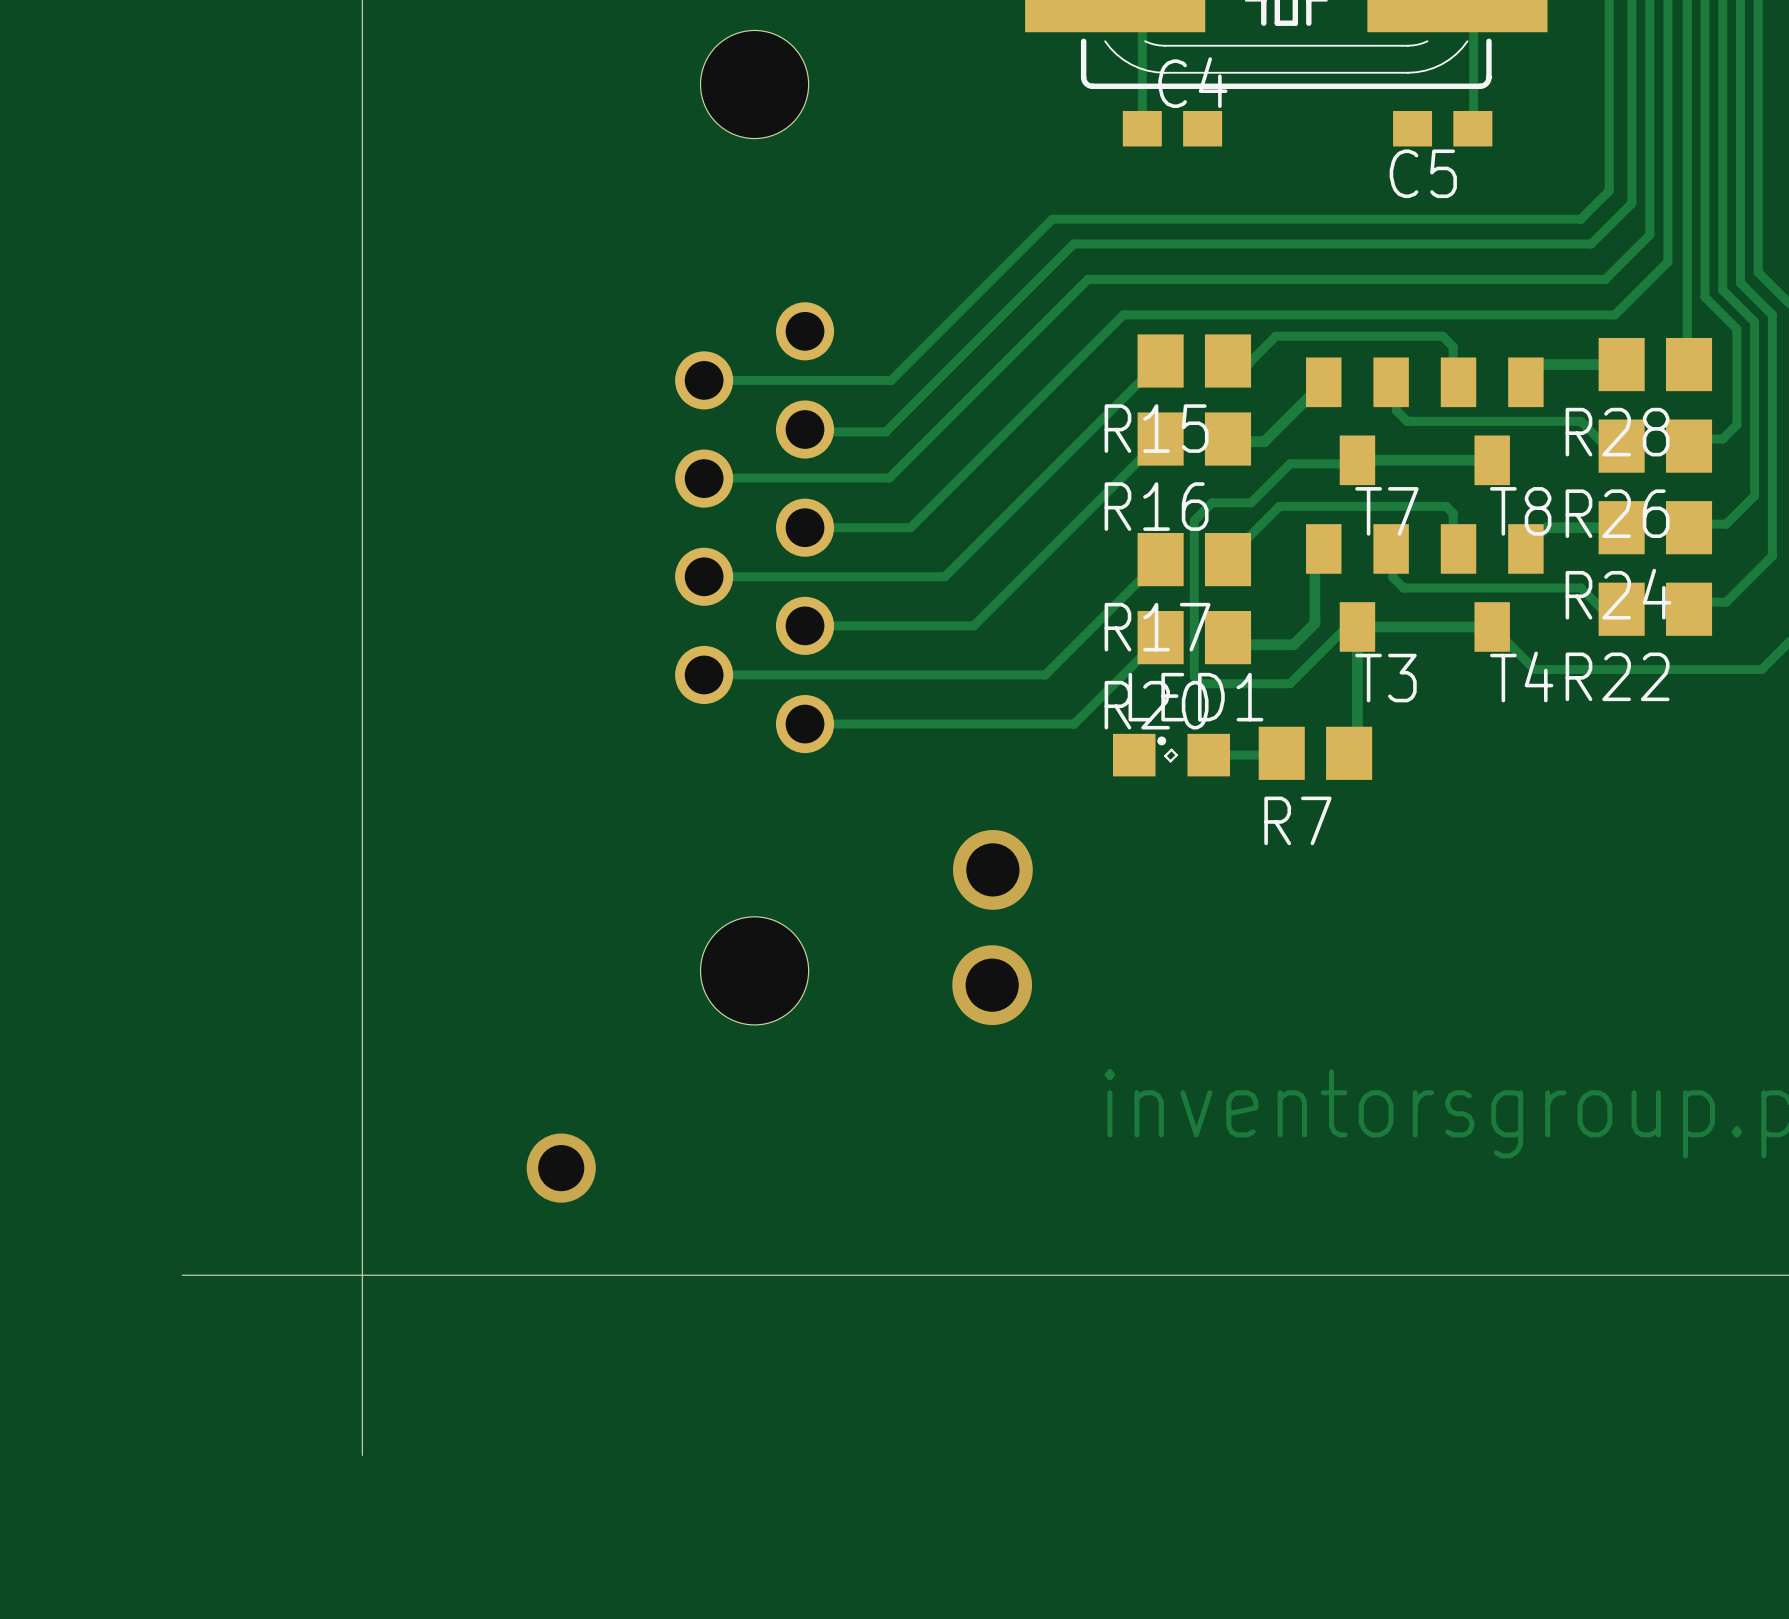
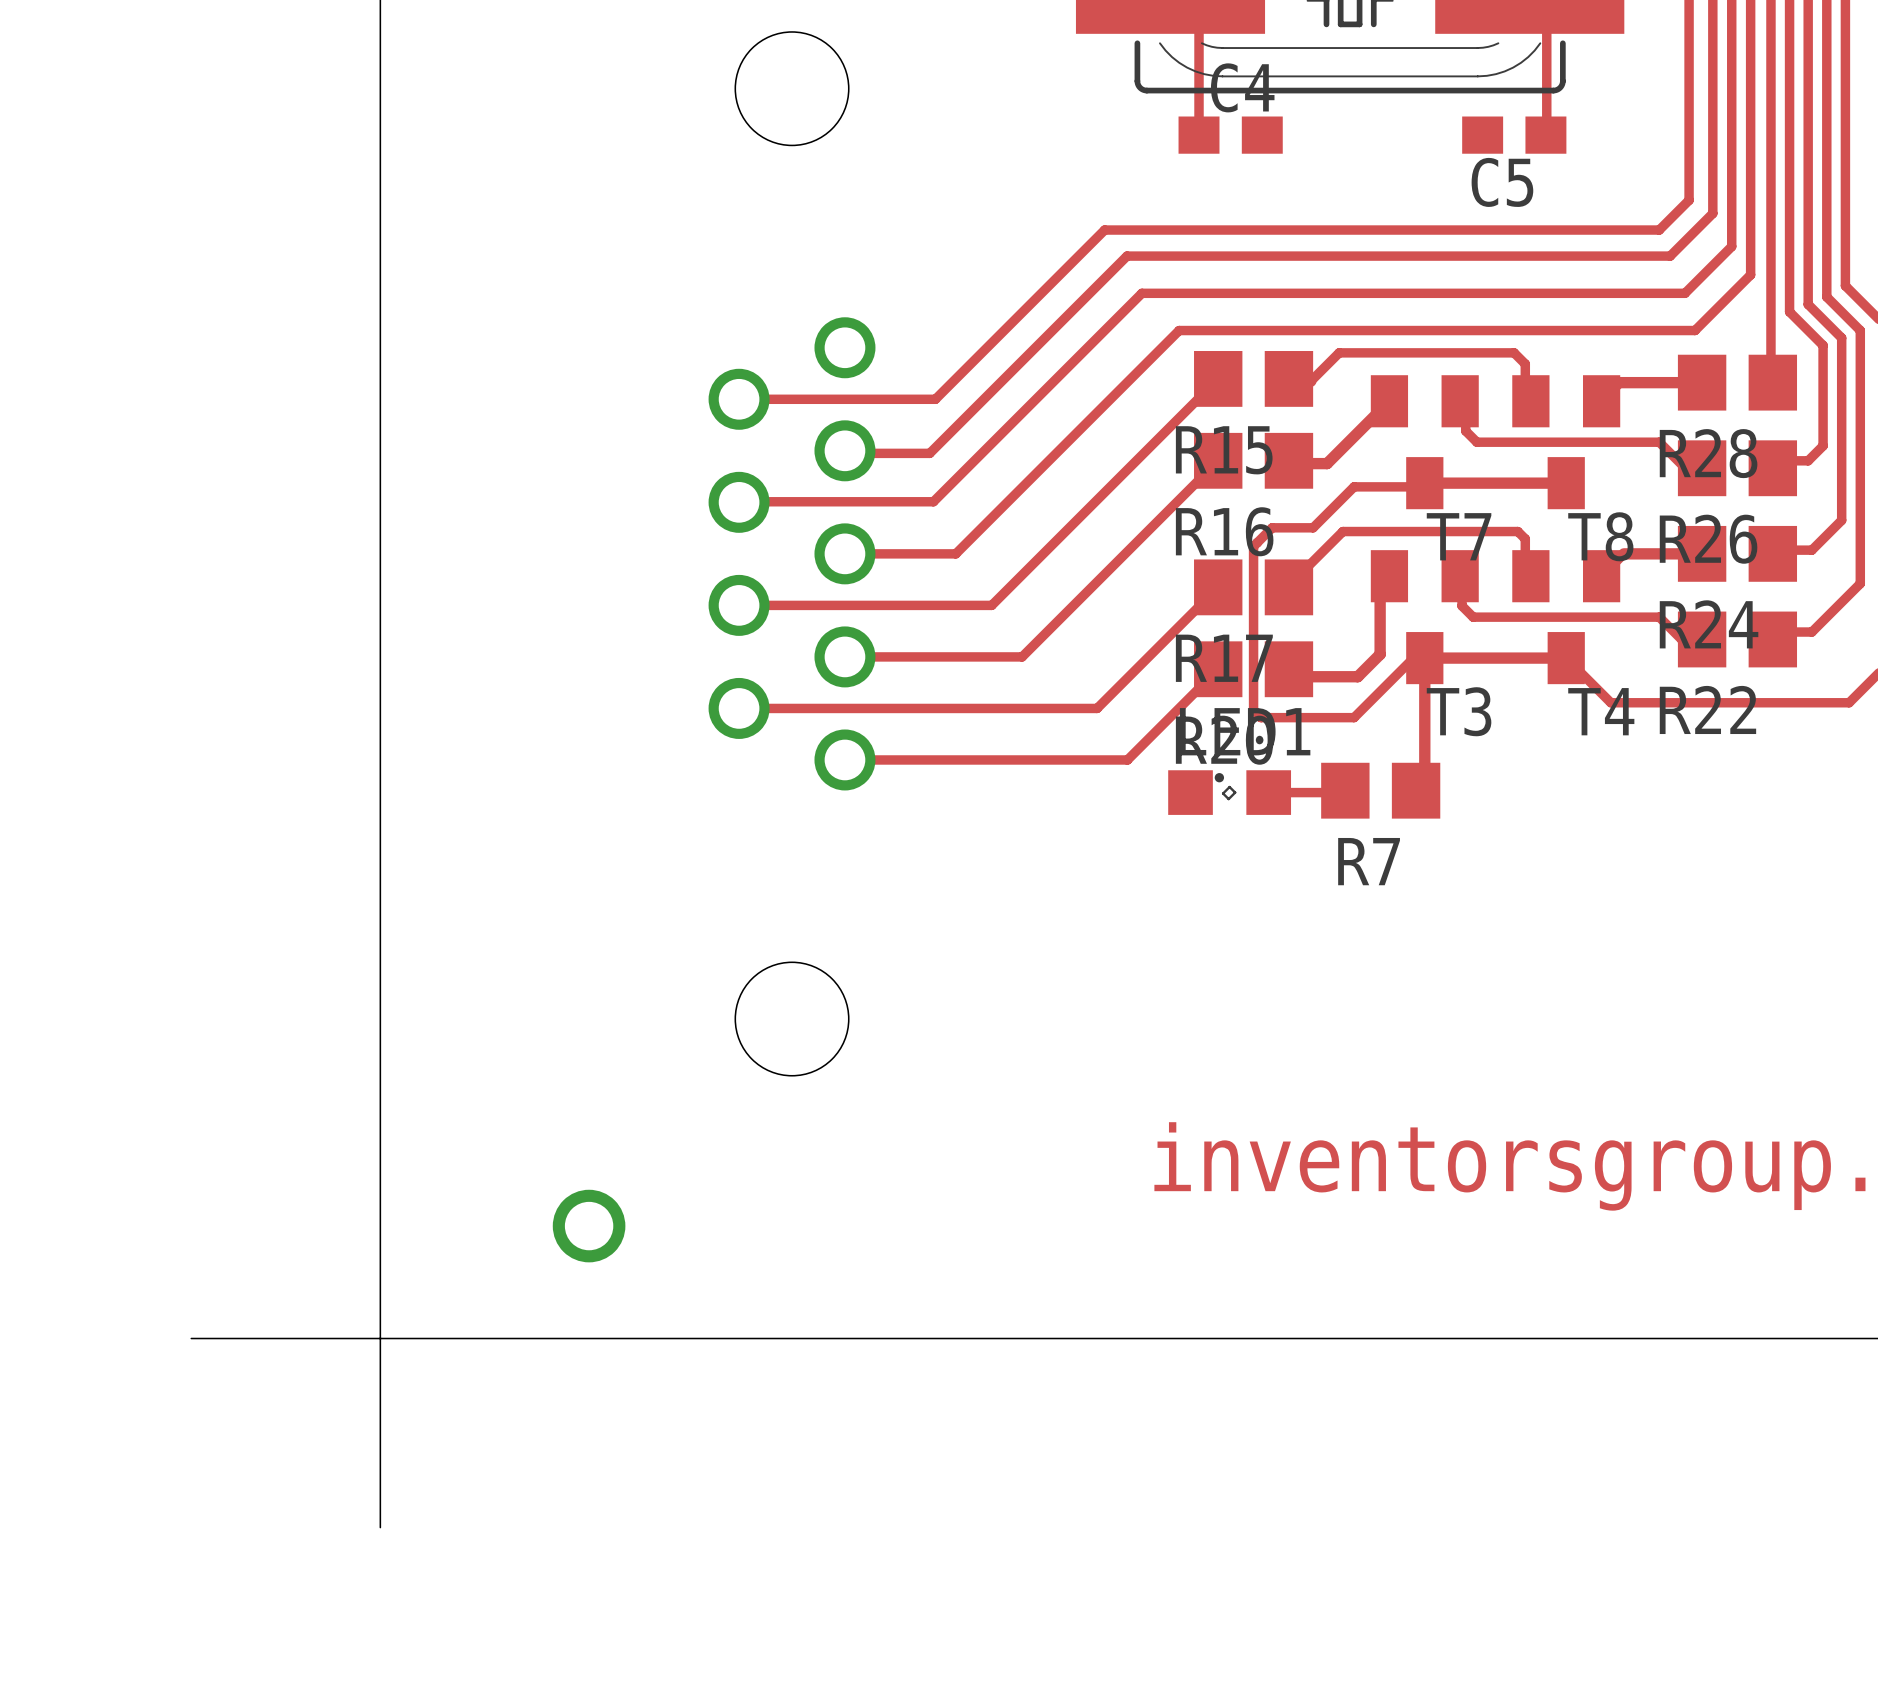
via: (992, 869) -> none
via: (992, 985) -> none

